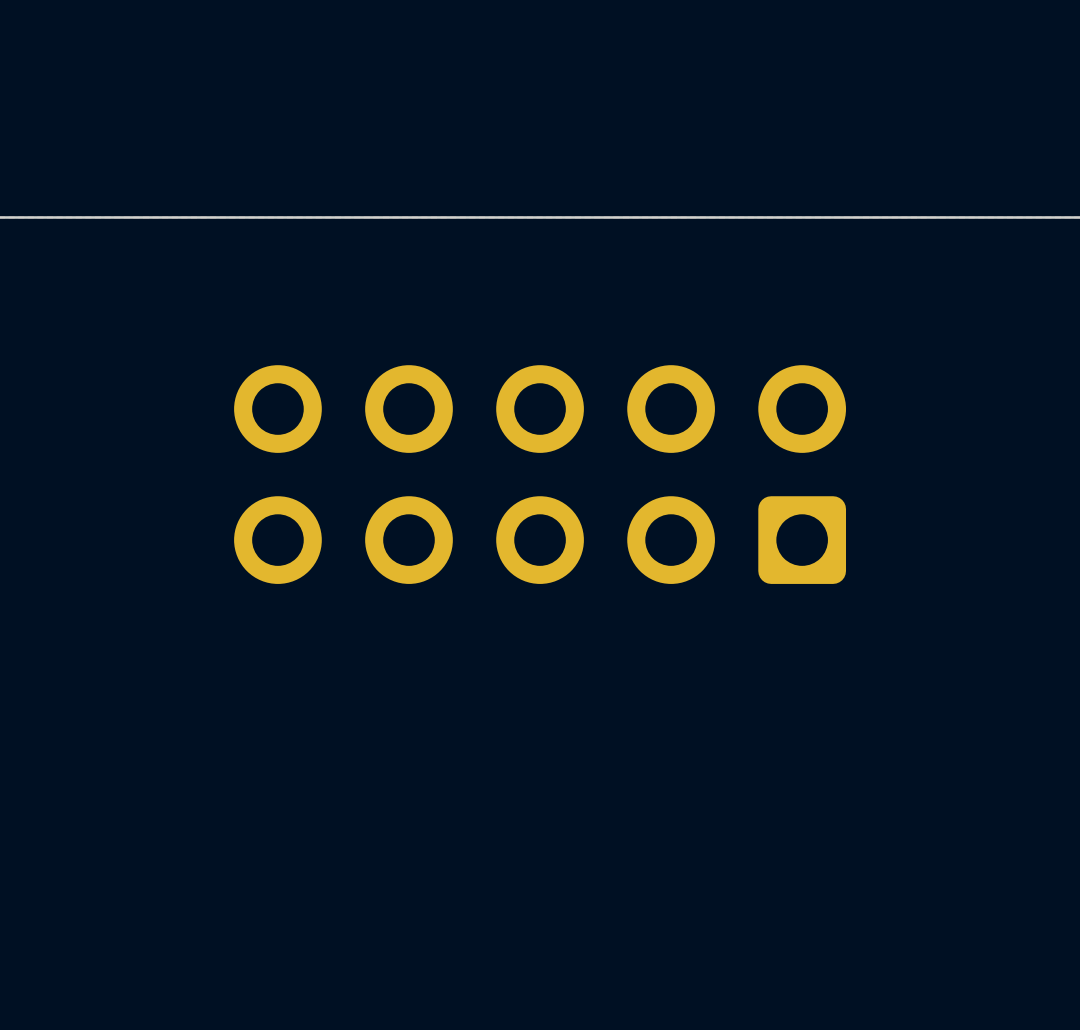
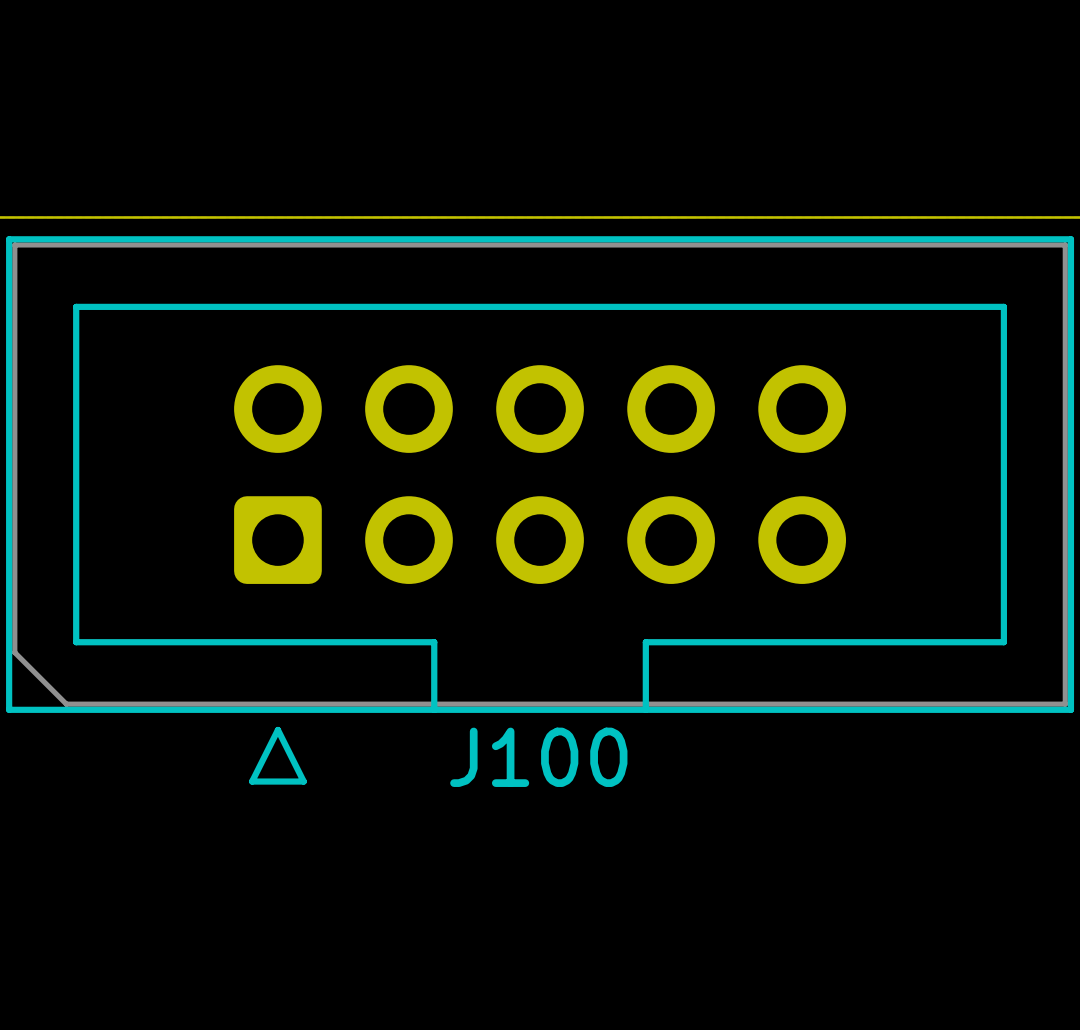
J100 side: bottom (540, 474) -> top (540, 510)

